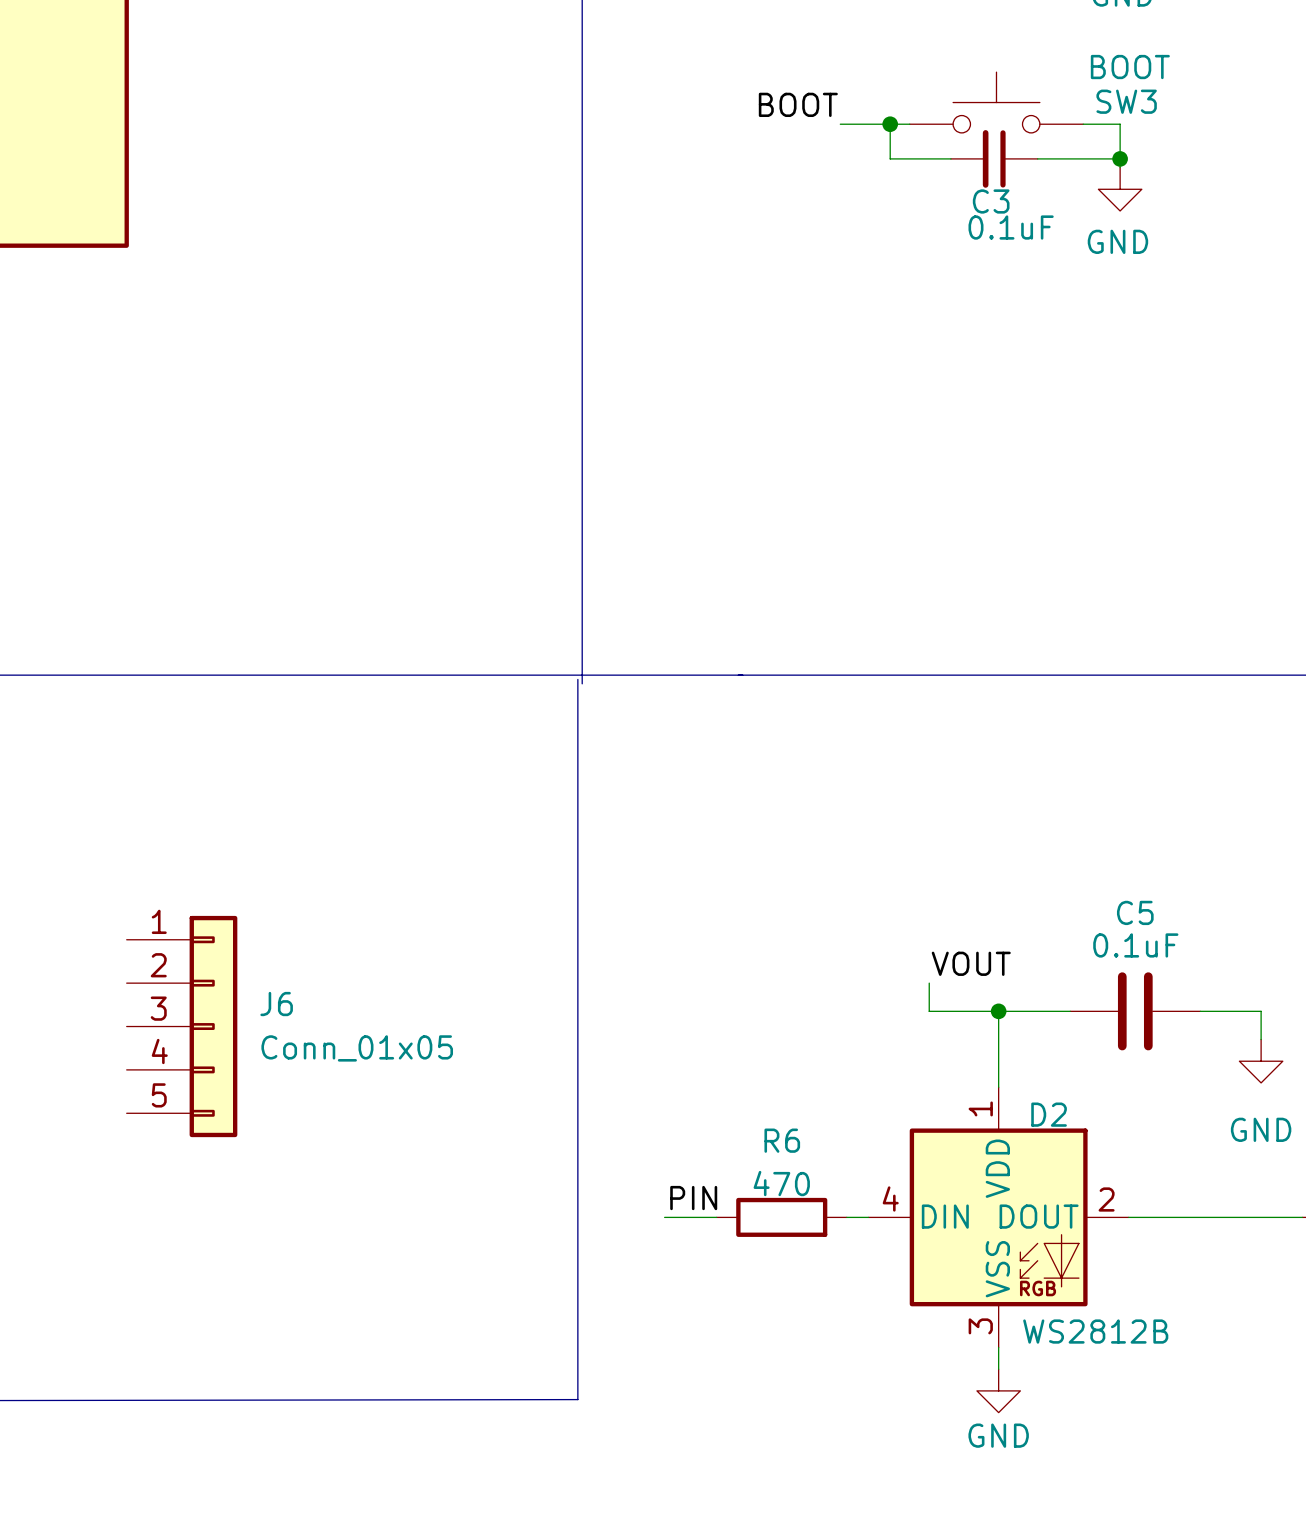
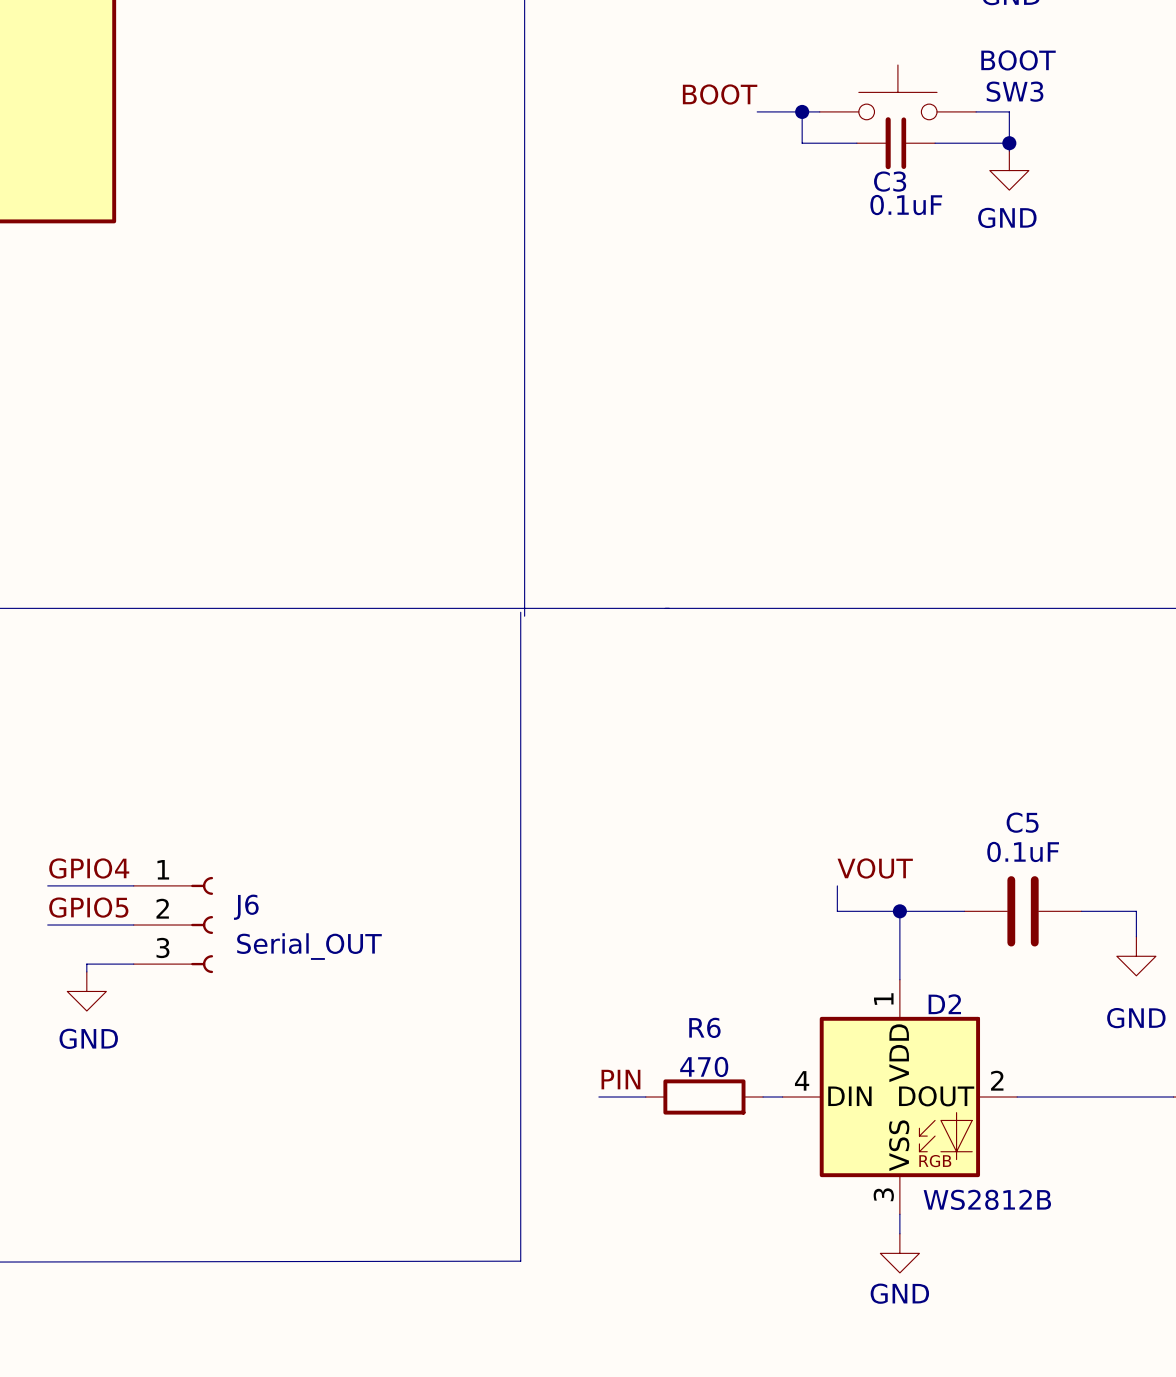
J6 symbol: [126, 915, 238, 1138] -> [133, 876, 214, 974]
label: none -> GPIO4 (89, 868)
wire: none -> (47, 885) (133, 885)
label: none -> GPIO5 (88, 907)
wire: none -> (47, 925) (133, 925)
J6 value: Conn_01x05 (357, 1048) -> Serial_OUT (309, 946)
wire: none -> (133, 964) (86, 964) (86, 971)
power symbol: none -> GND (86, 991)

